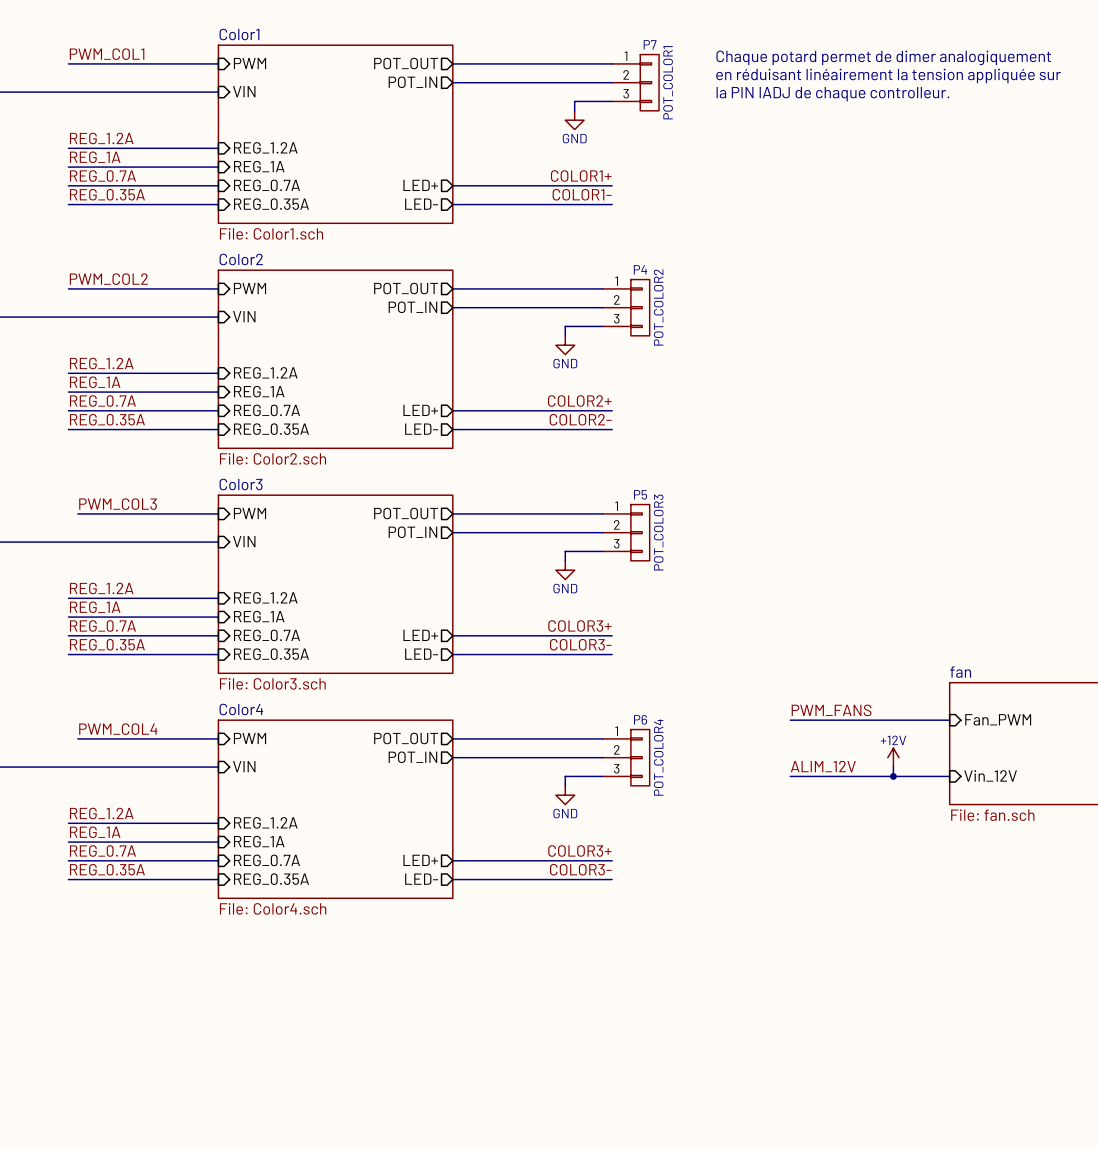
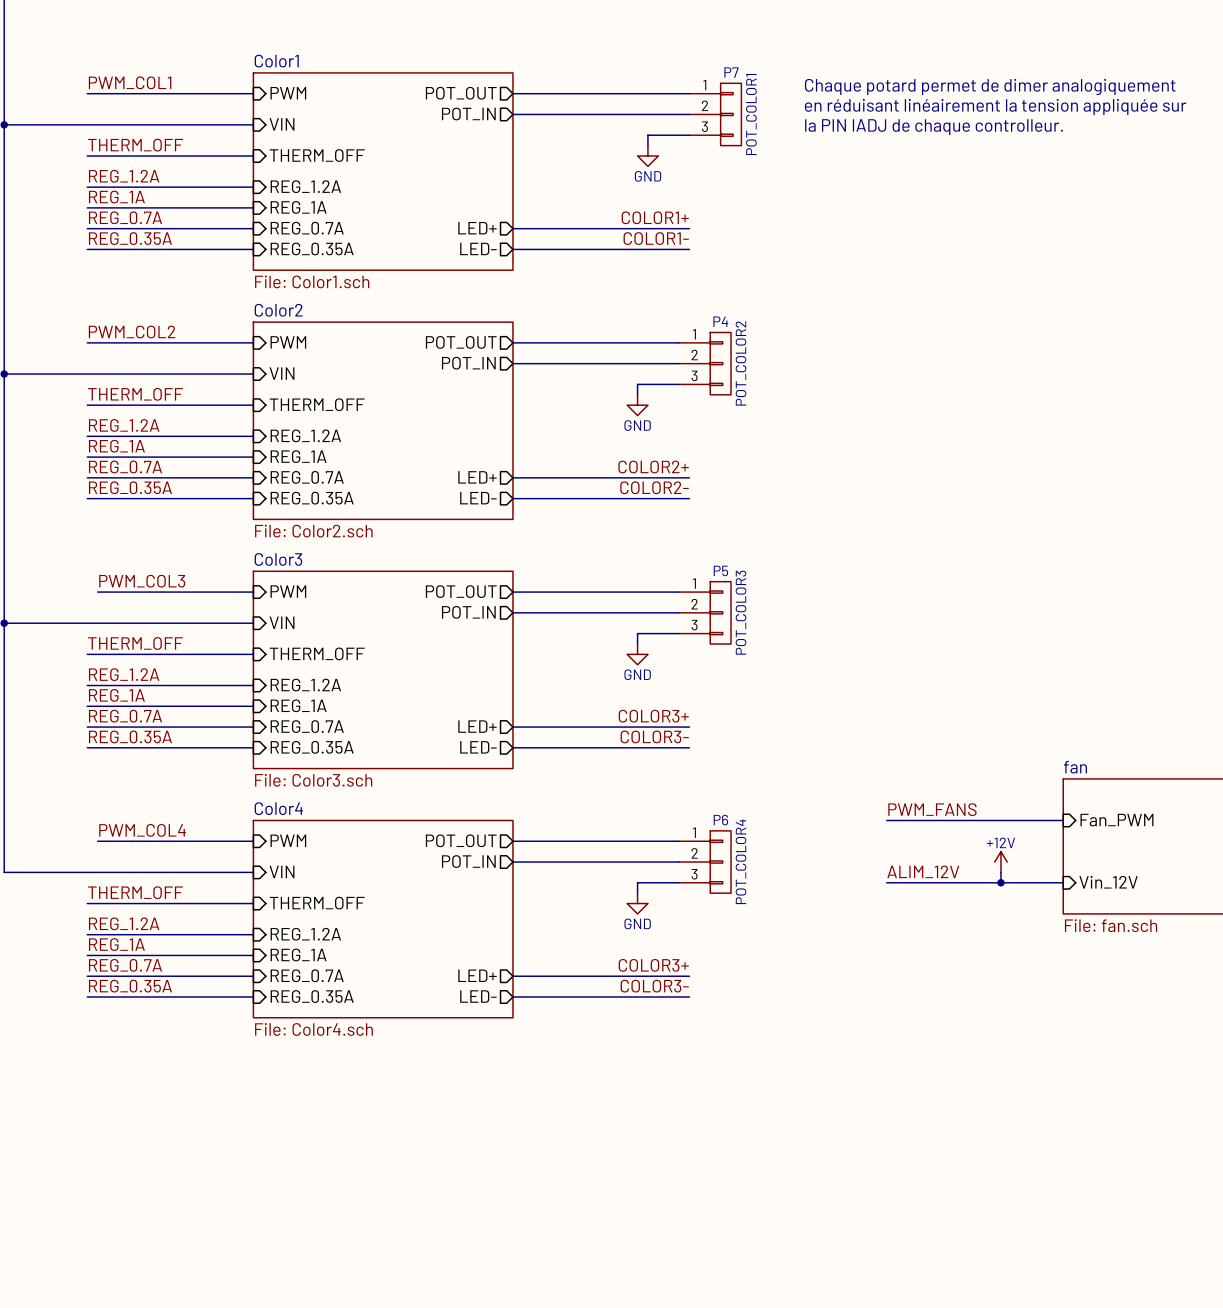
label: none -> THERM_OFF (135, 145)
sheet pin: none -> THERM_OFF (317, 155)
wire: none -> (87, 155) (253, 155)
label: none -> THERM_OFF (135, 394)
sheet pin: none -> THERM_OFF (317, 404)
wire: none -> (87, 405) (253, 405)
label: none -> THERM_OFF (135, 643)
sheet pin: none -> THERM_OFF (317, 653)
wire: none -> (87, 654) (253, 654)
label: none -> THERM_OFF (135, 892)
sheet pin: none -> THERM_OFF (317, 903)
wire: none -> (87, 903) (253, 903)

